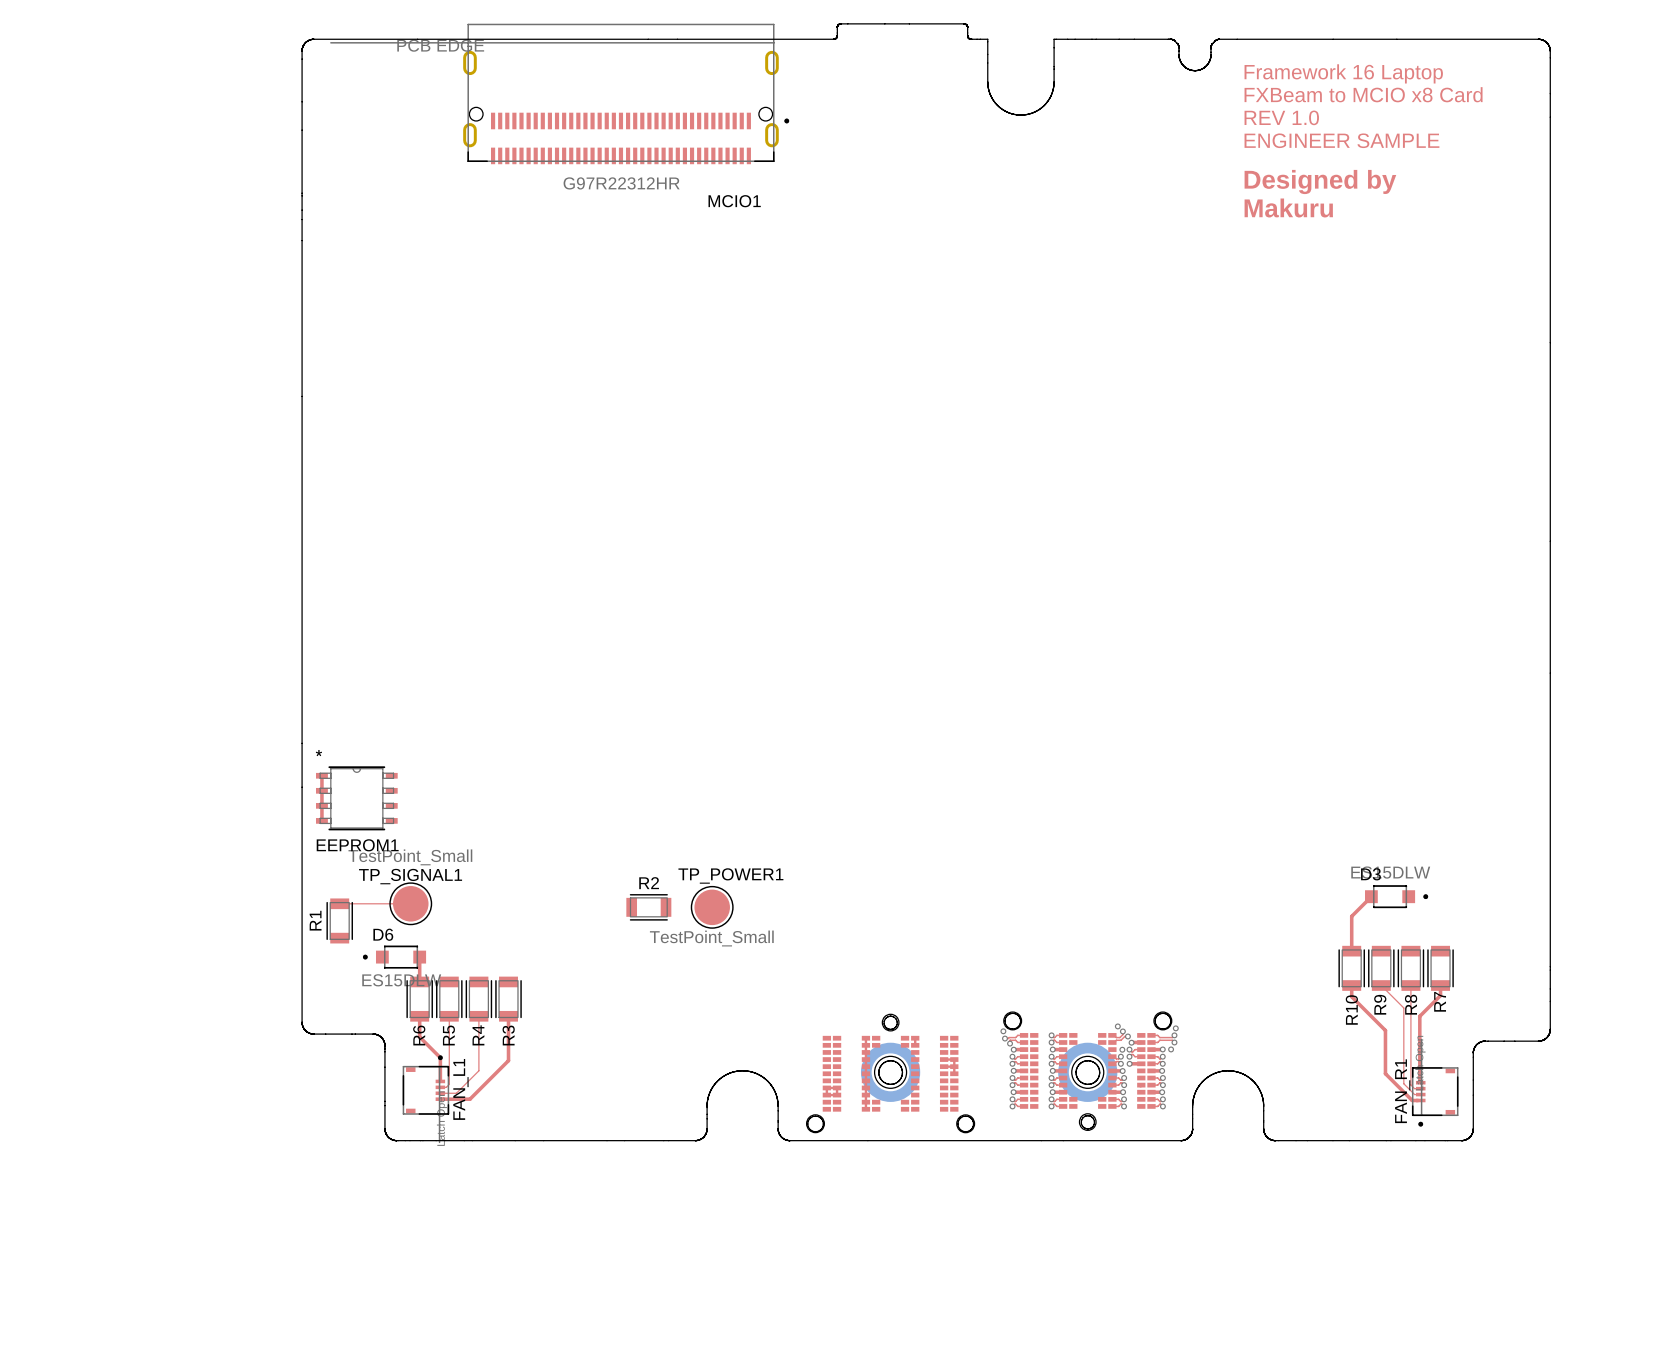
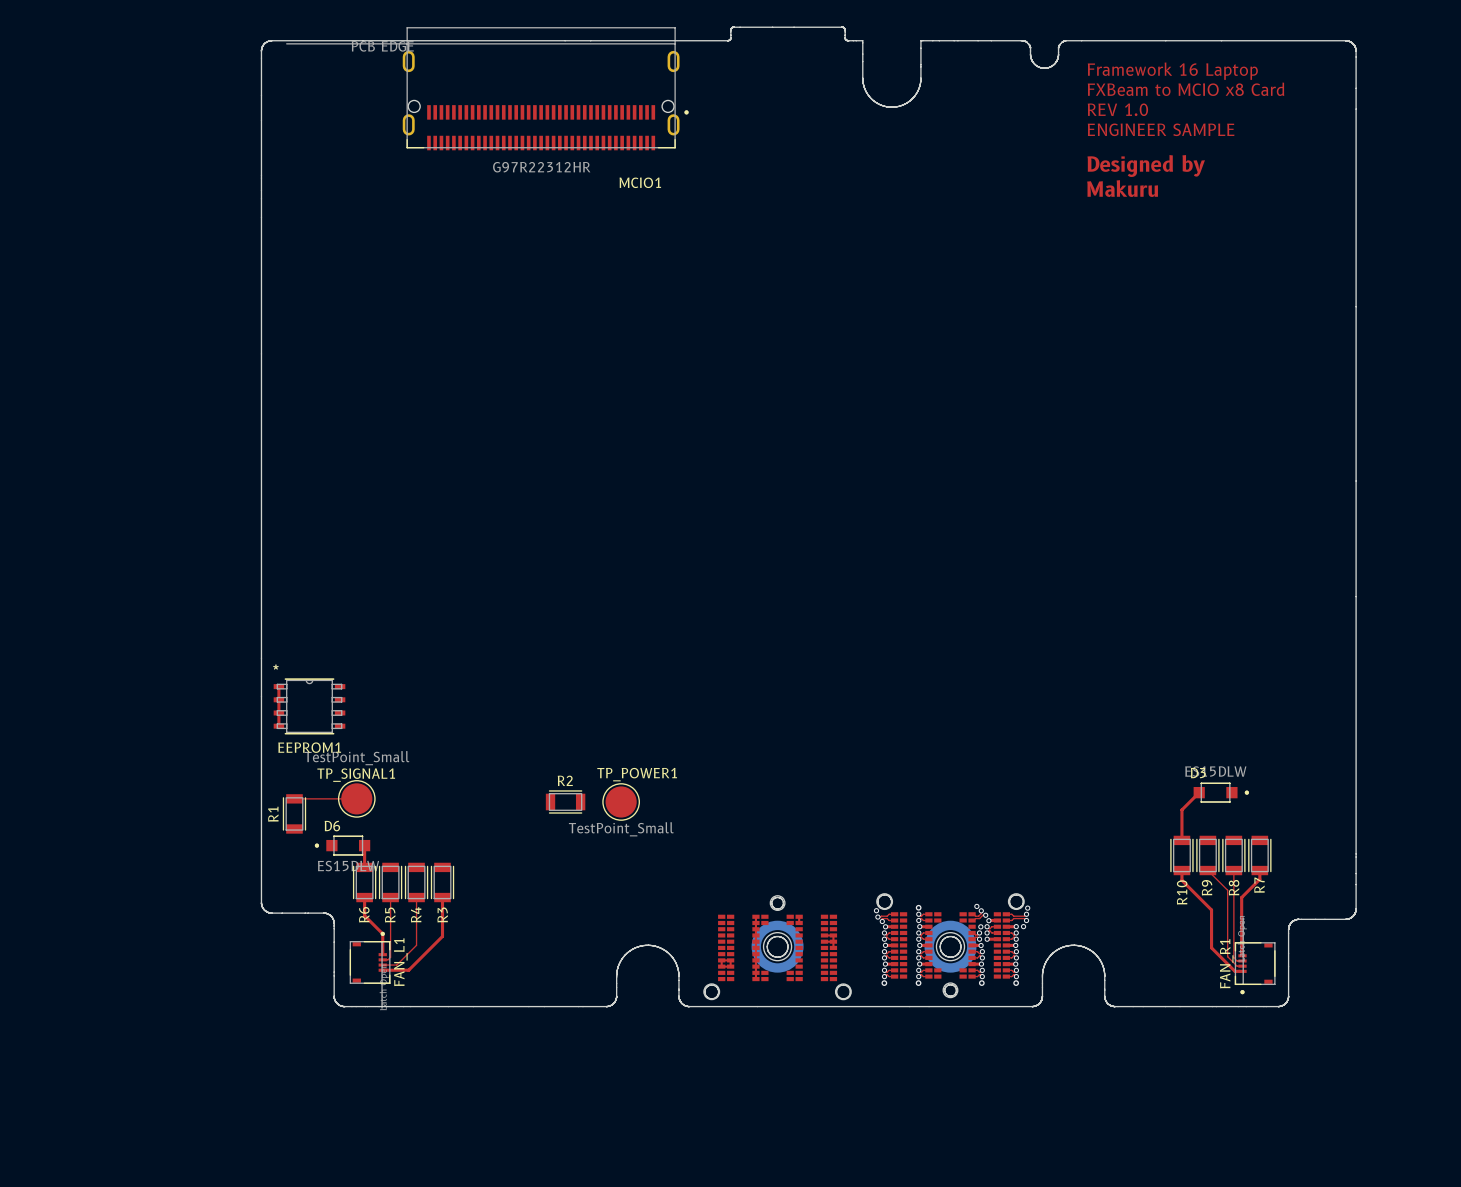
via: none -> (918, 907)
via: none -> (884, 983)
via: none -> (918, 983)
via: none -> (981, 983)
via: none -> (1016, 983)

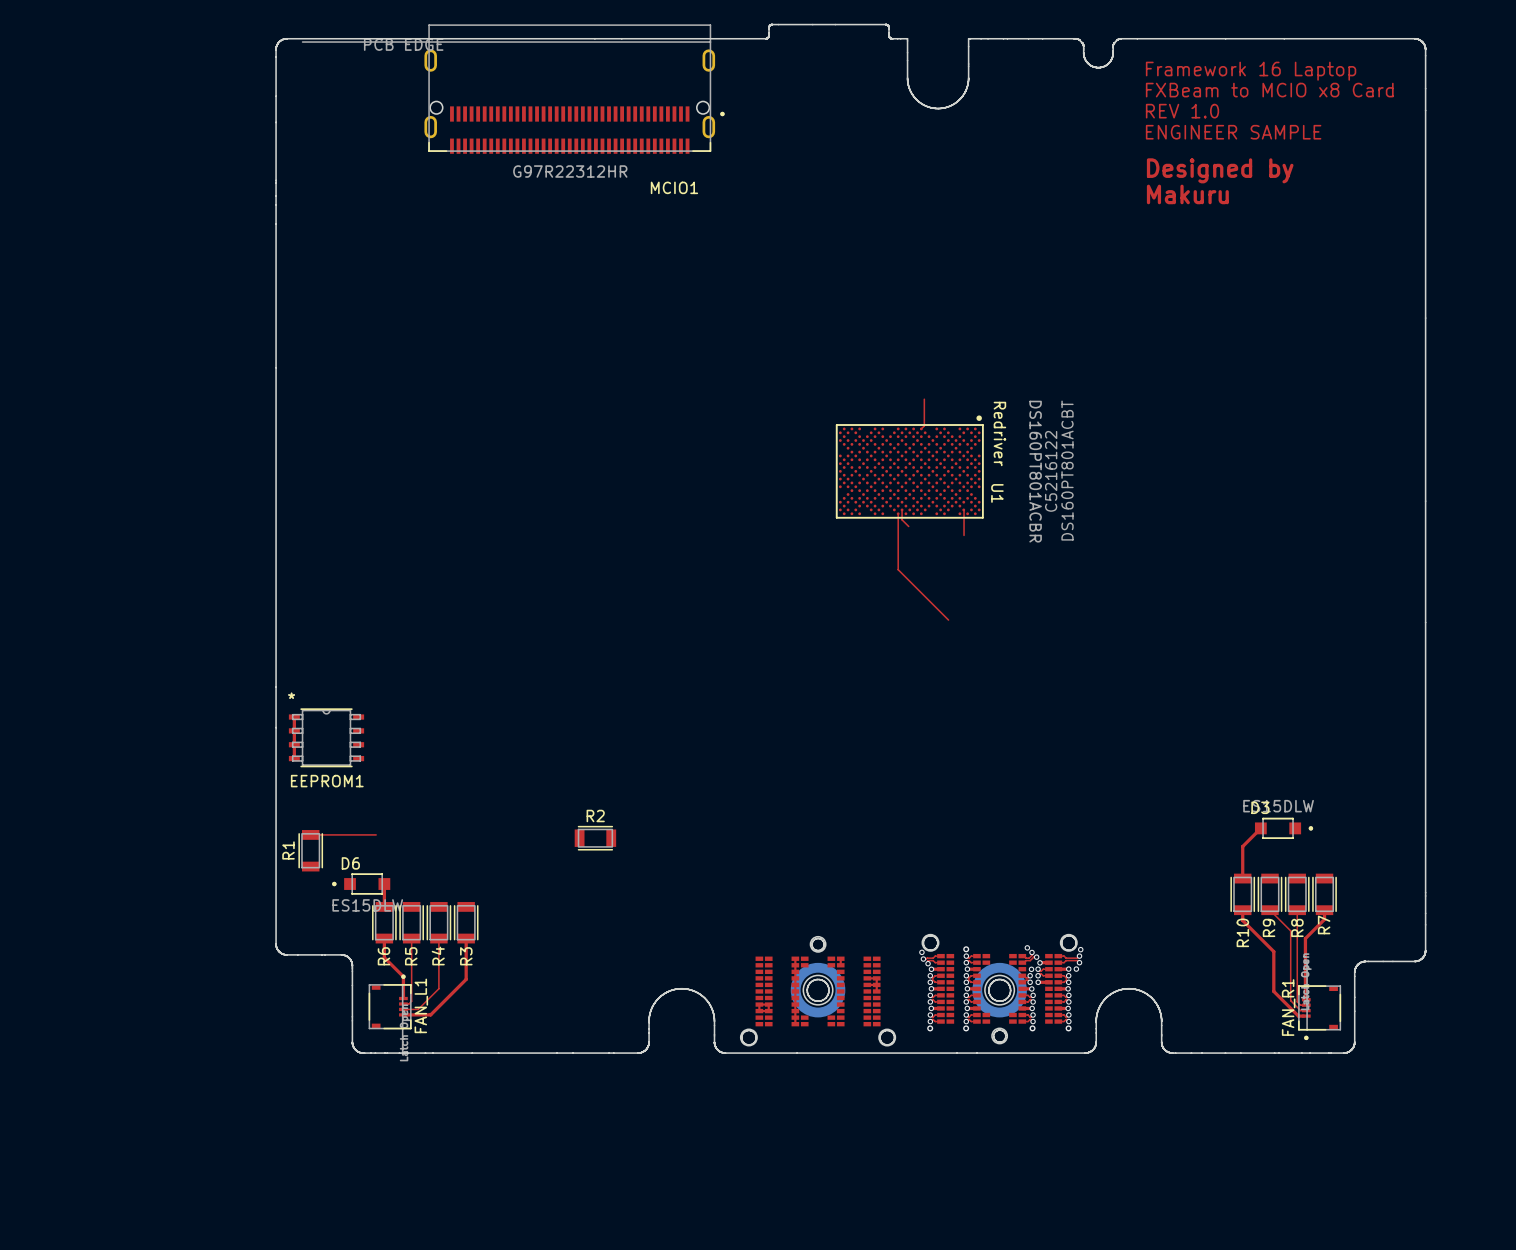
top track: none -> (924, 399) (924, 425) (921, 428)
U1: none -> DS160PT801ACBR (909, 466)
top track: none -> (902, 509) (902, 519) (908, 526)
top track: none -> (963, 509) (964, 535)
top track: none -> (898, 513) (898, 569) (948, 620)
TP_SIGNAL1: TestPoint_Small (356, 798) -> none
TP_POWER1: TestPoint_Small (621, 801) -> none

